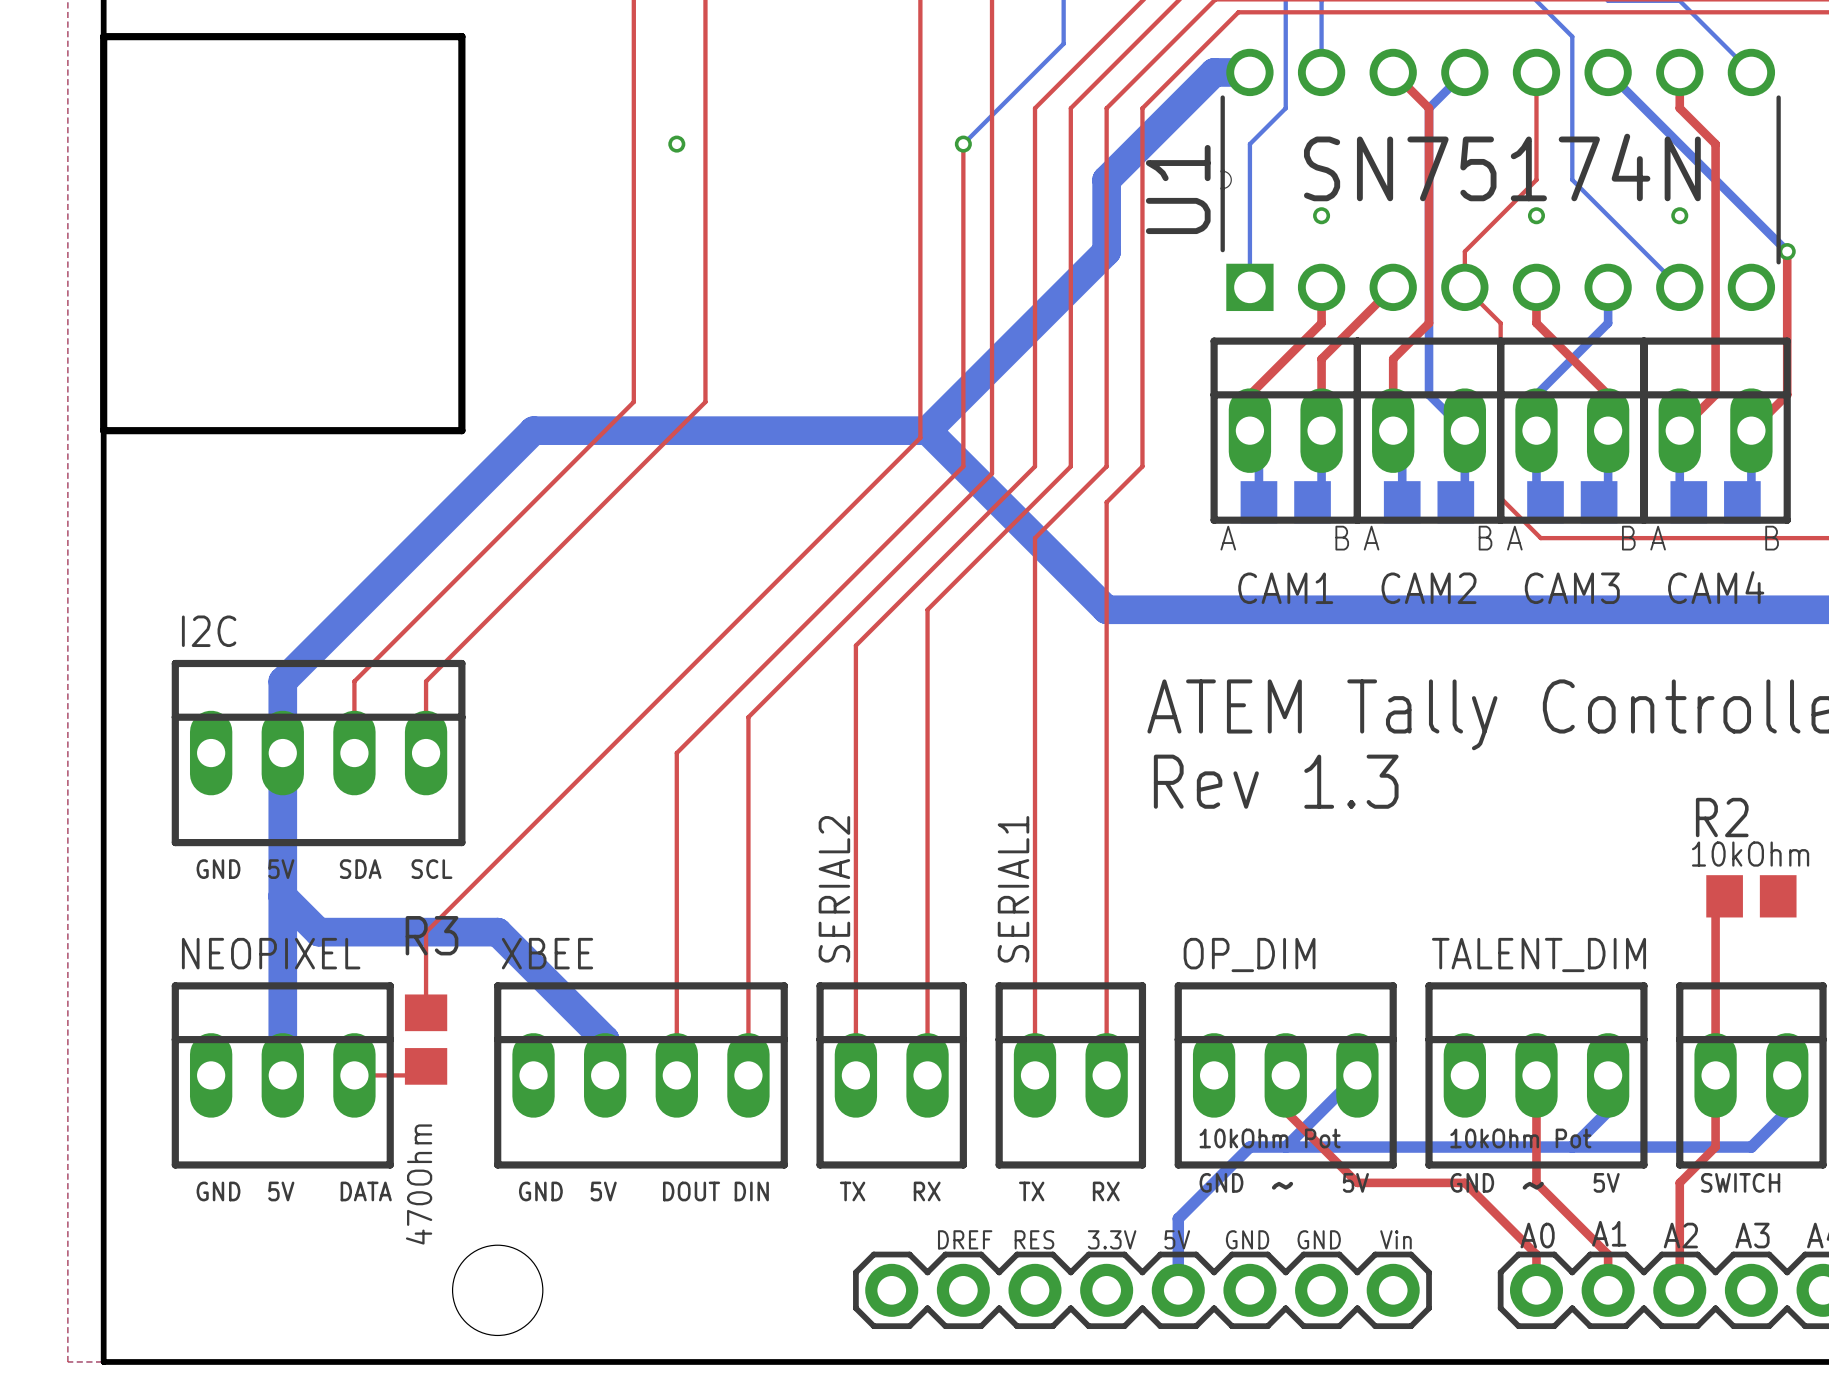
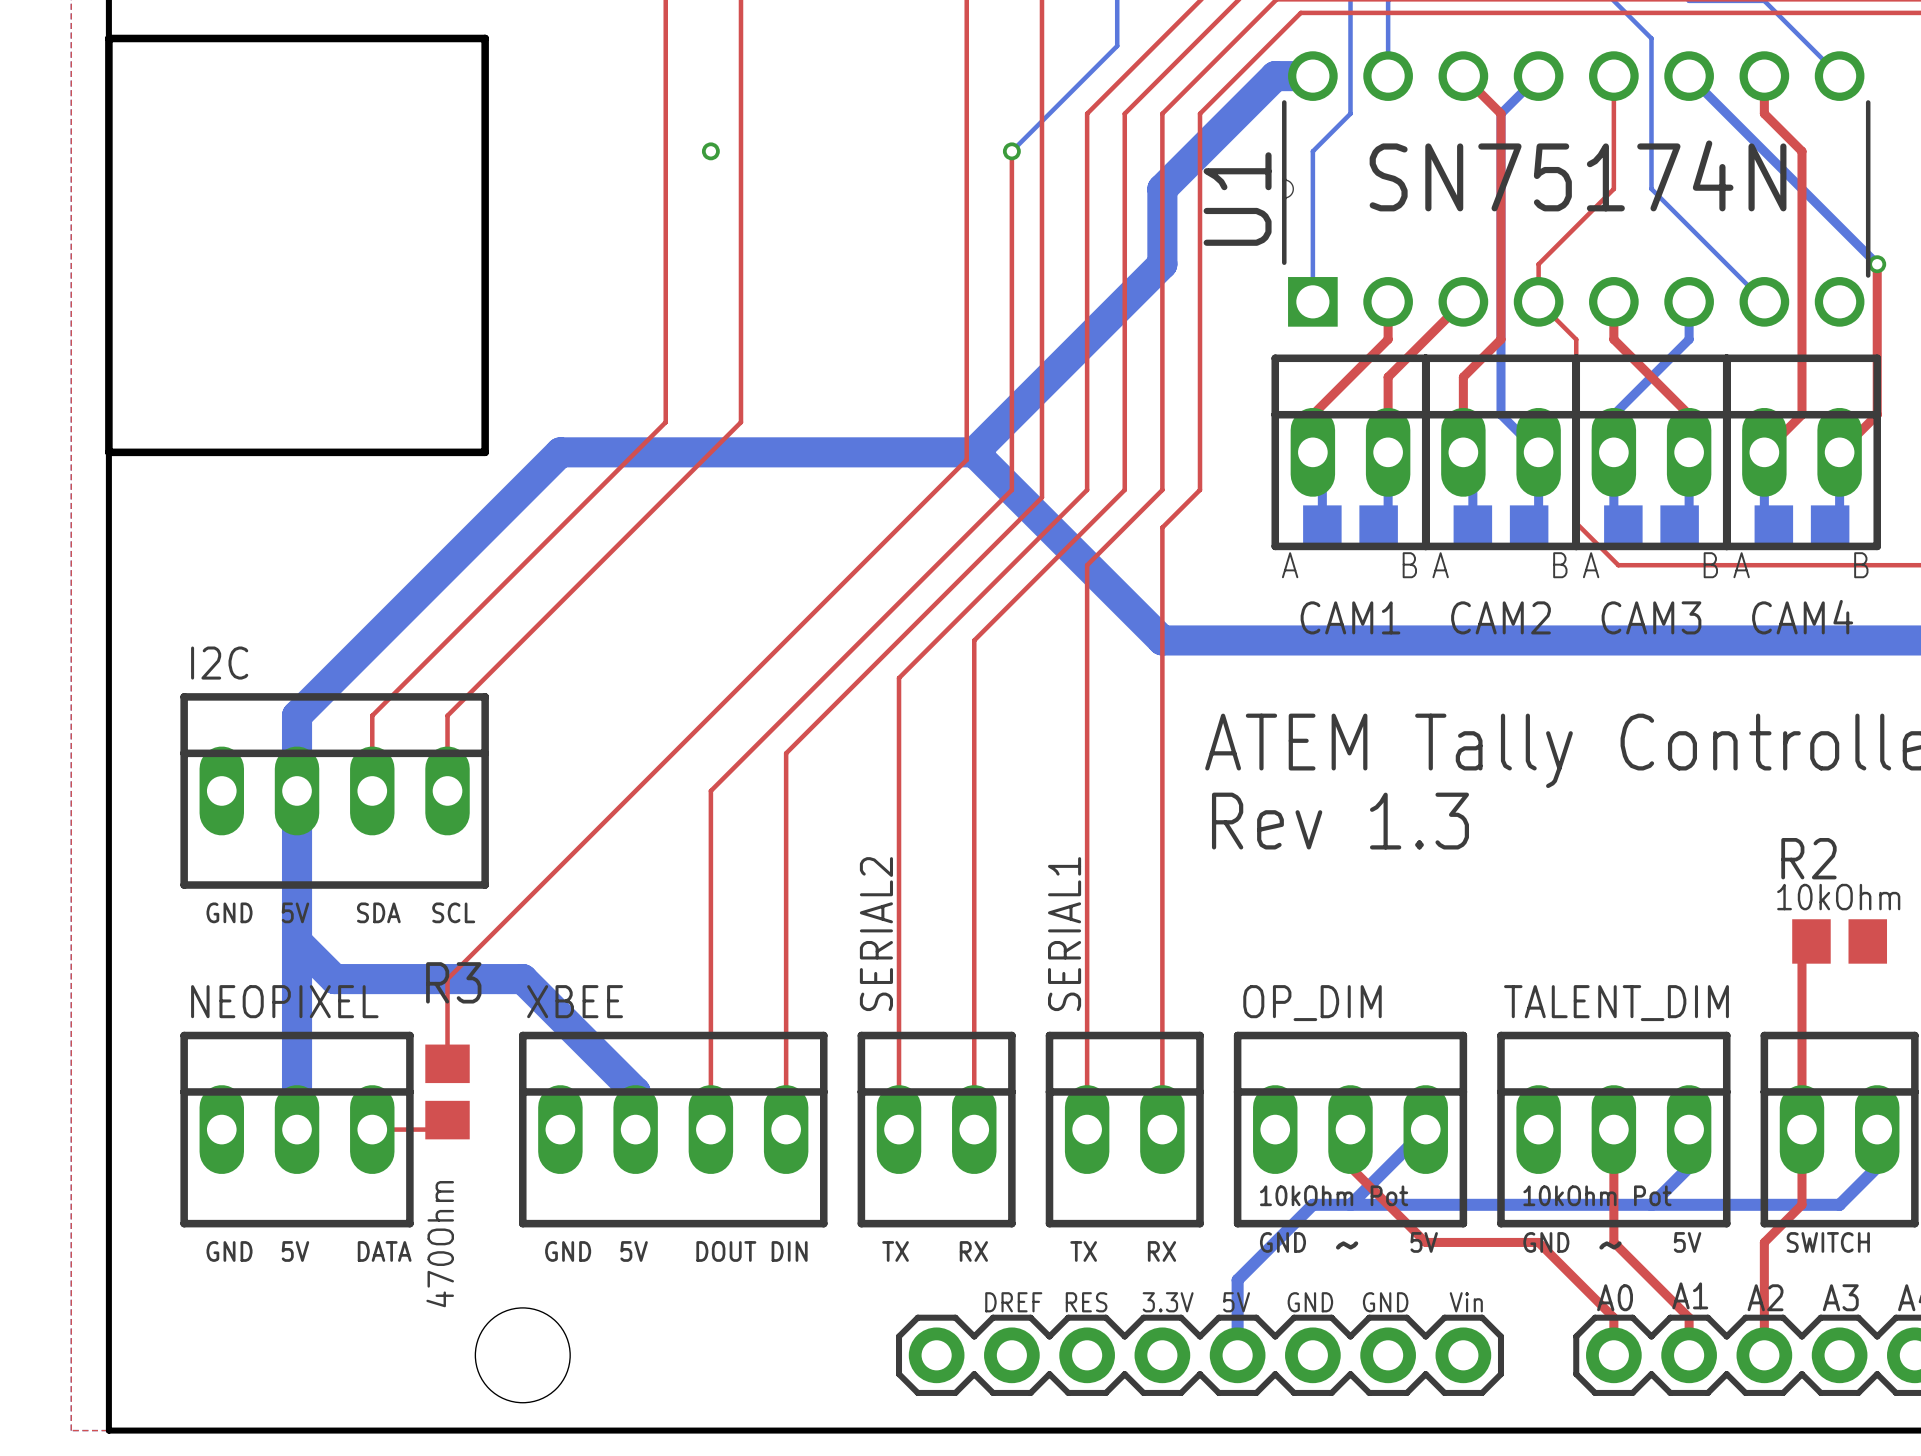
via: (1321, 215) -> none
via: (1536, 215) -> none
via: (1679, 215) -> none

